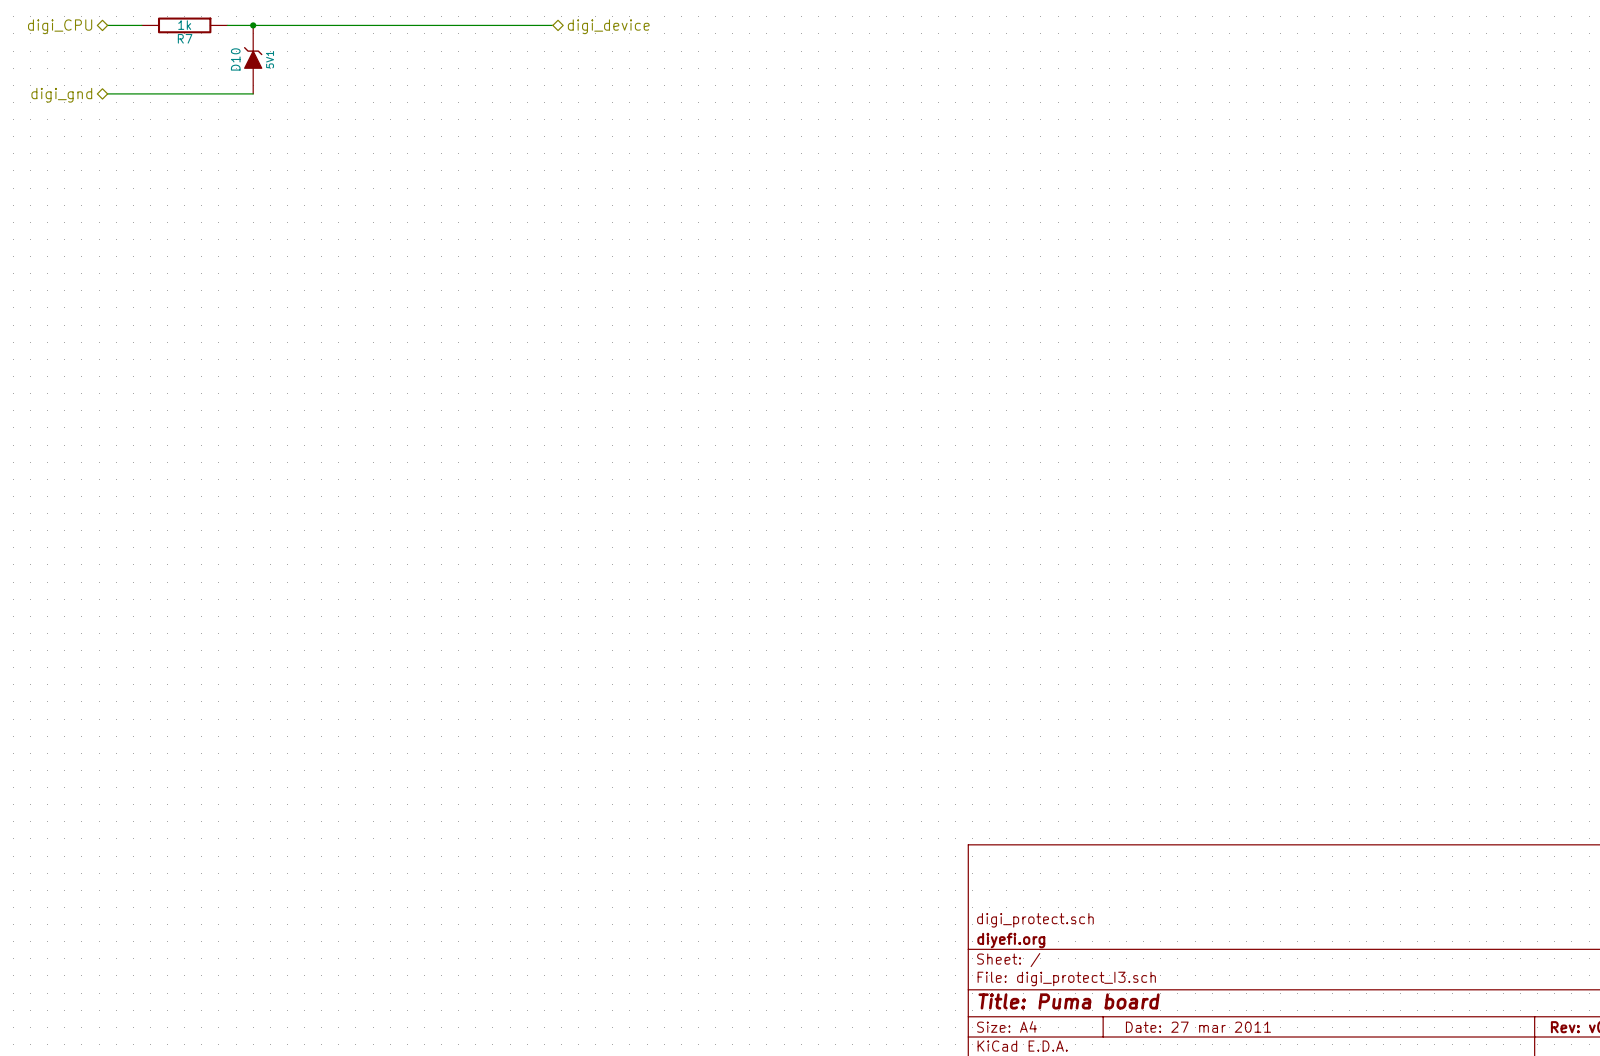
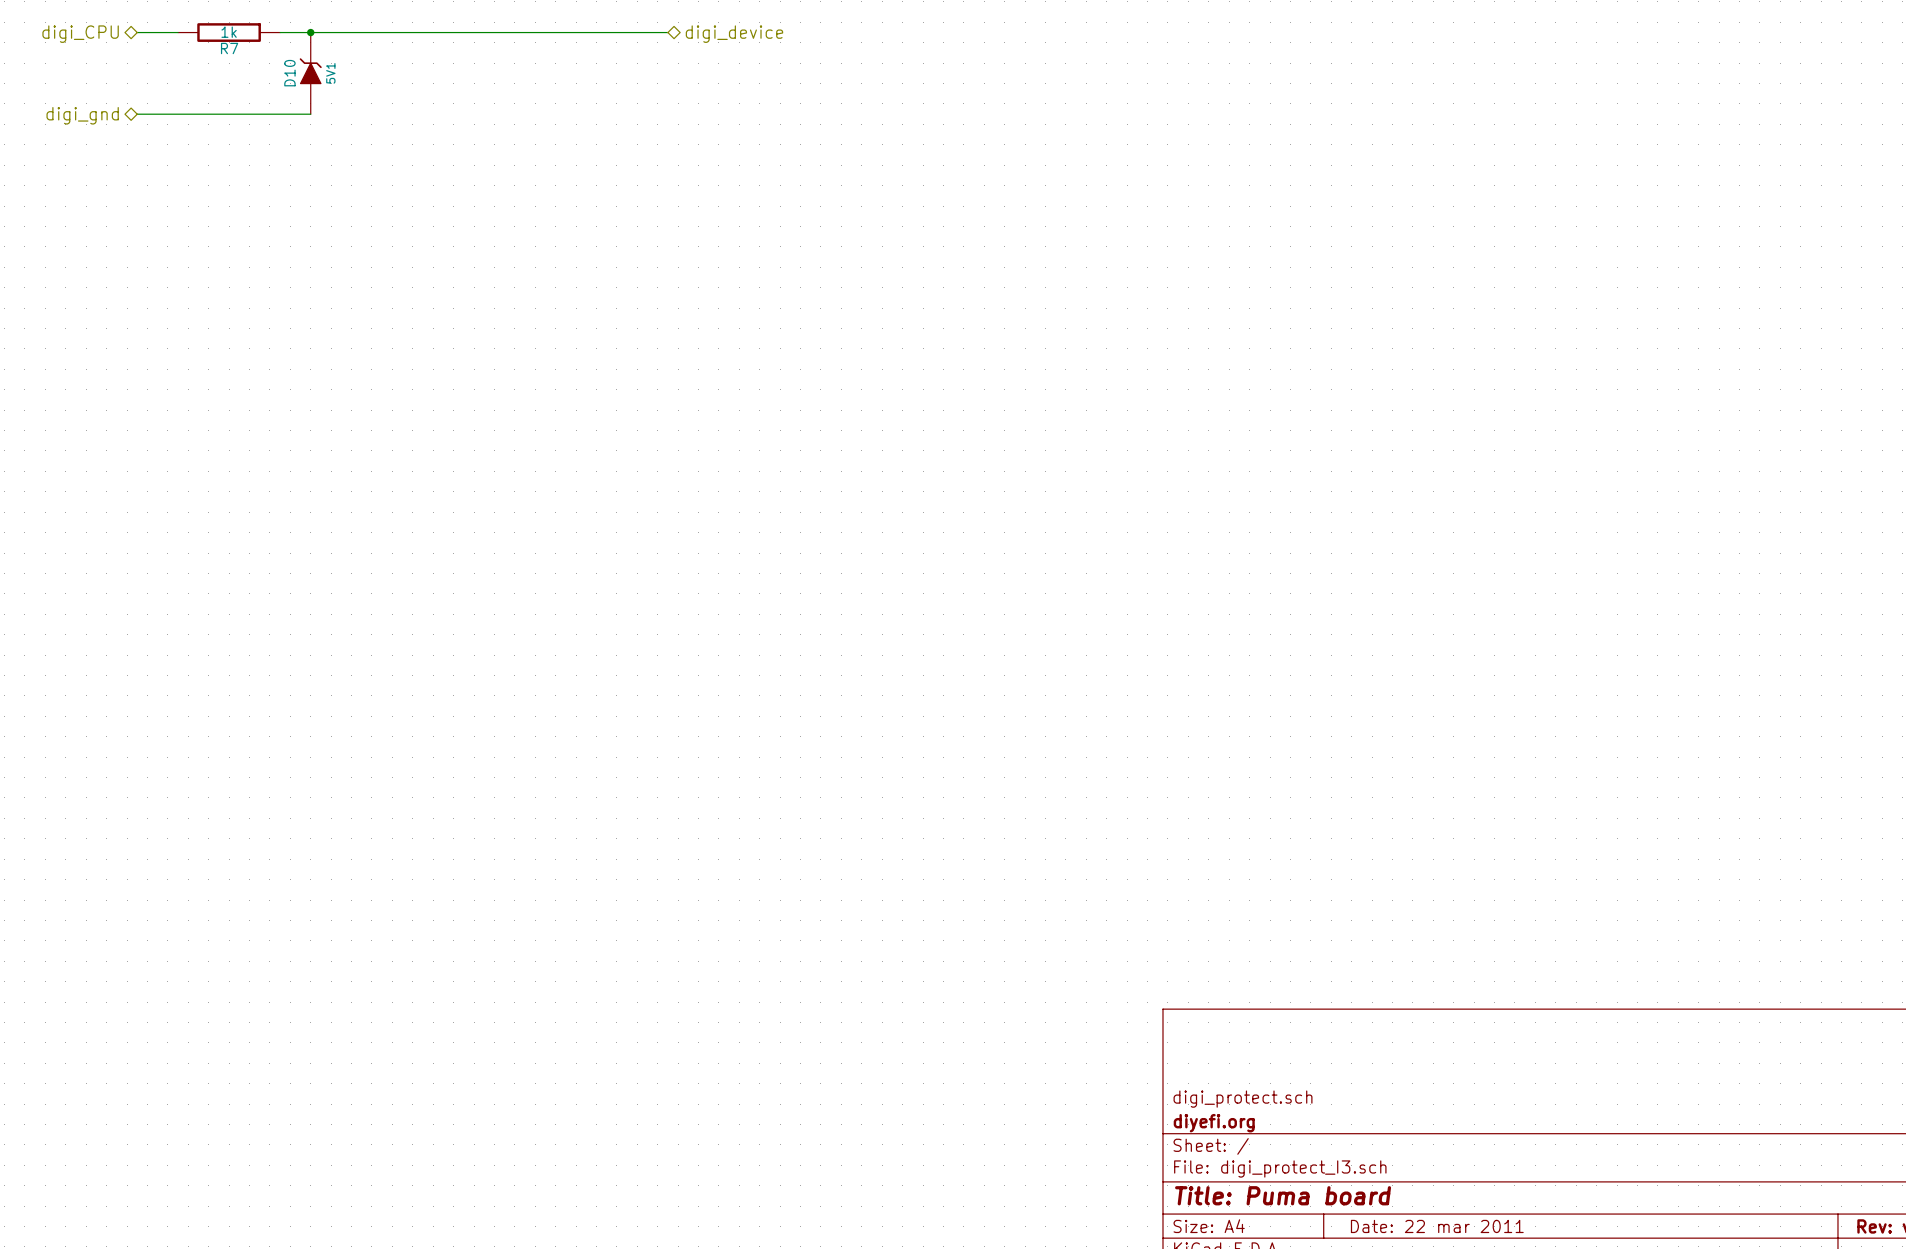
title block: Date: 27 mar 2011 (1198, 1027) -> Date: 22 mar 2011 (1437, 1226)

